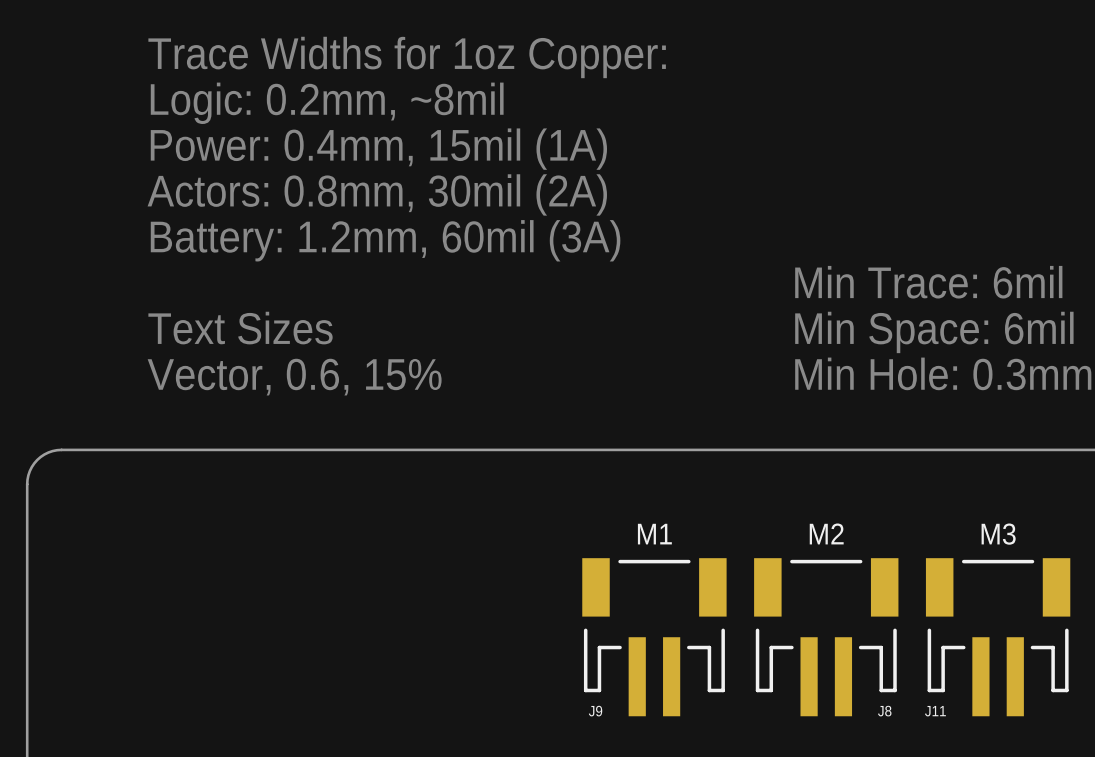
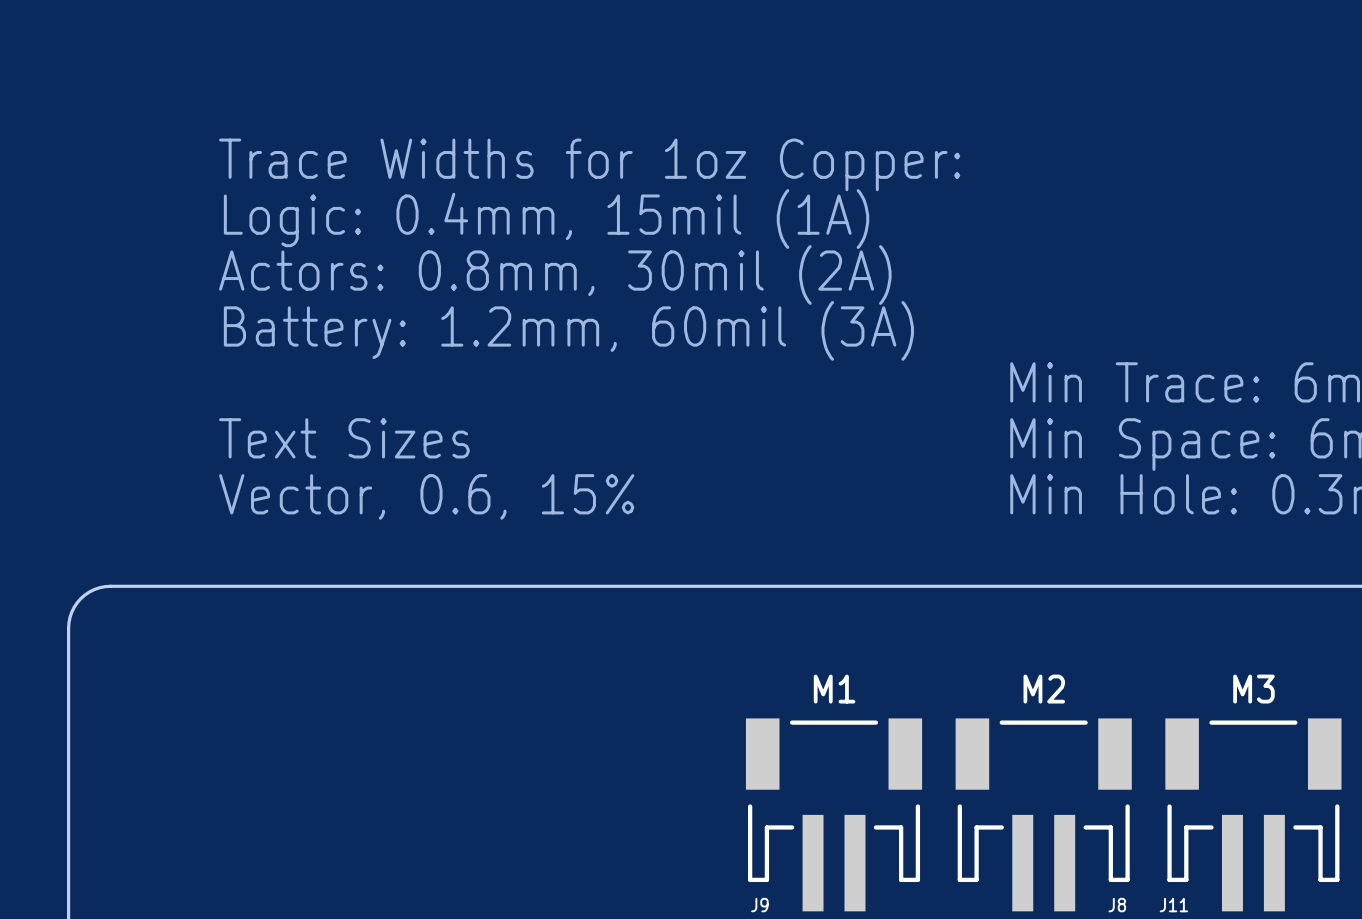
text: Trace Widths for 1oz Copper: (407, 57) -> none
text: Logic: 0.2mm, ~8mil (327, 103) -> Trace Widths for 1oz Copper: (589, 164)
text: Power: 0.4mm, 15mil (1A) (378, 149) -> Logic: 0.4mm, 15mil (1A) (546, 219)

